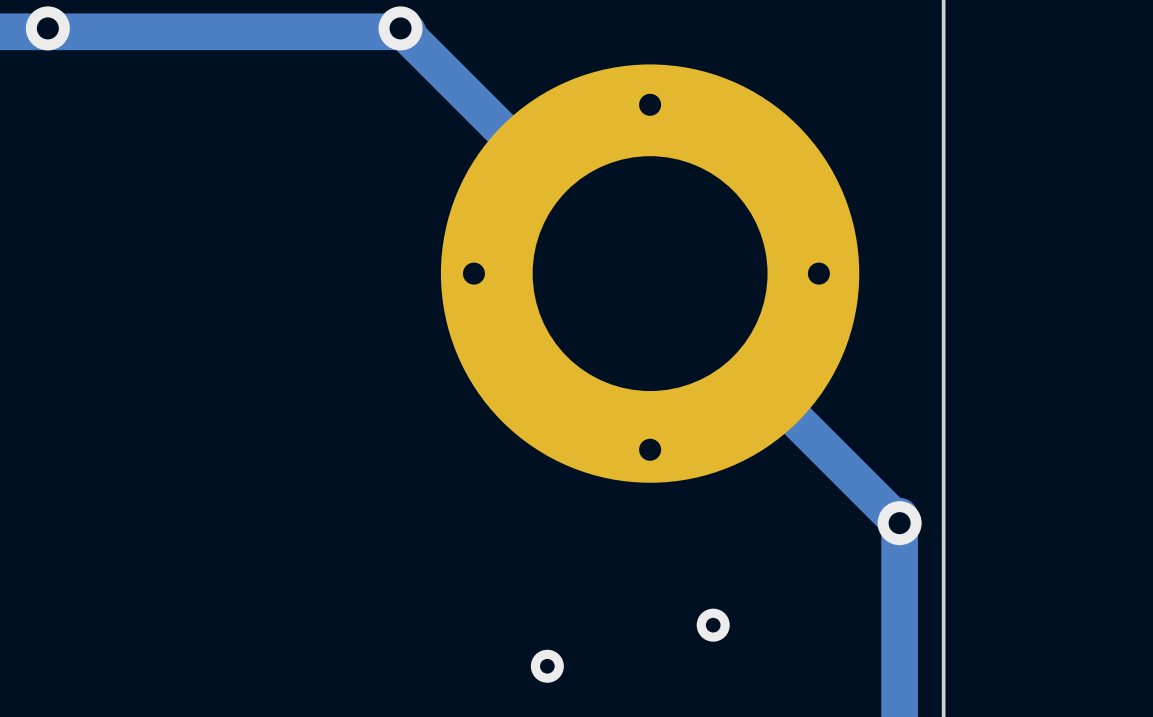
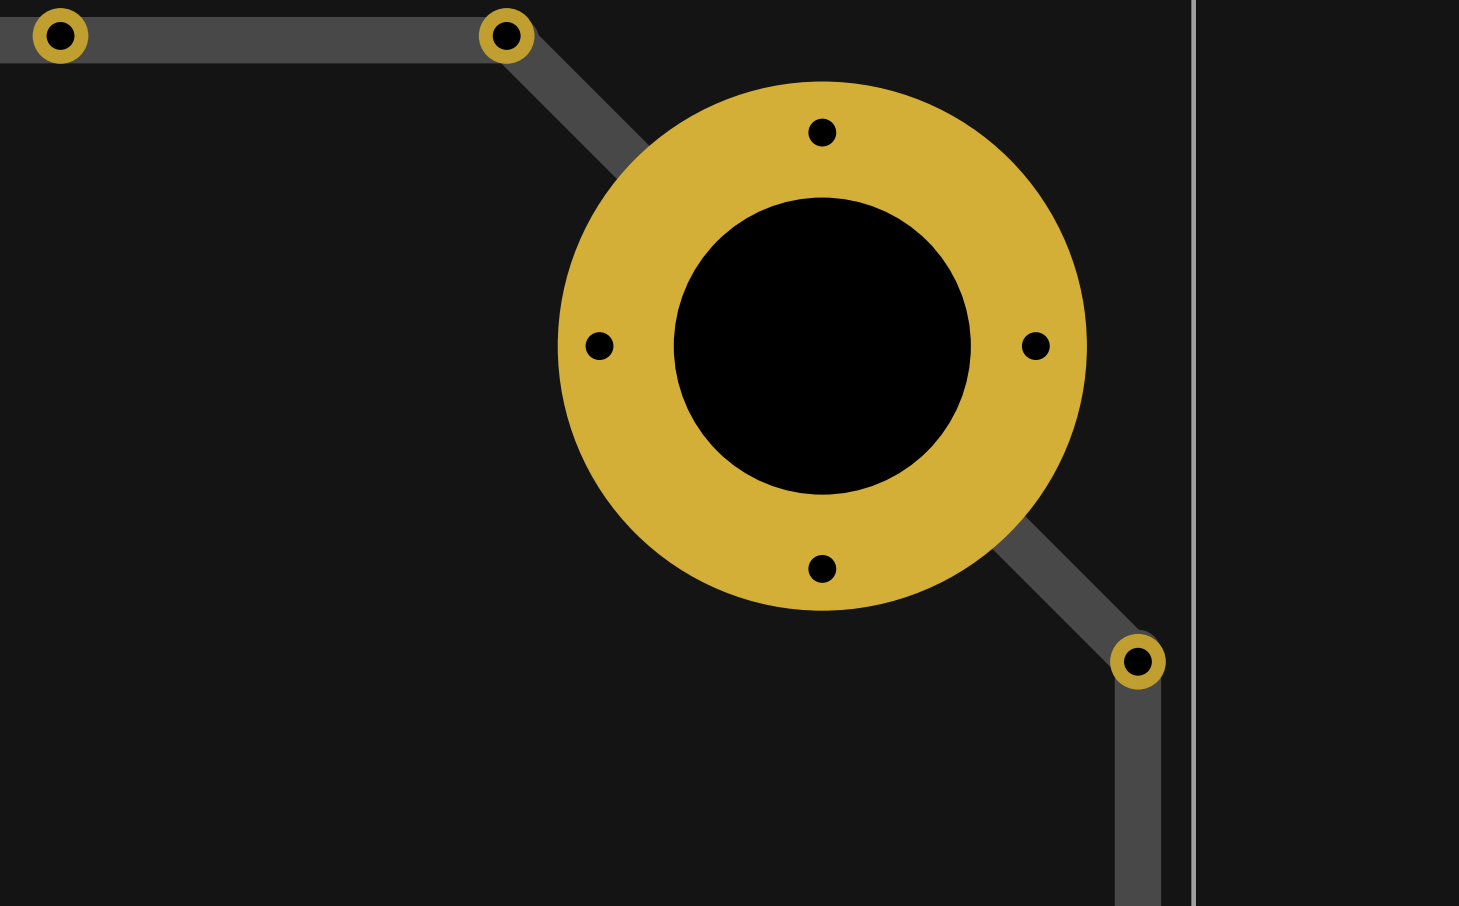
via: (713, 625) -> none
via: (547, 666) -> none

